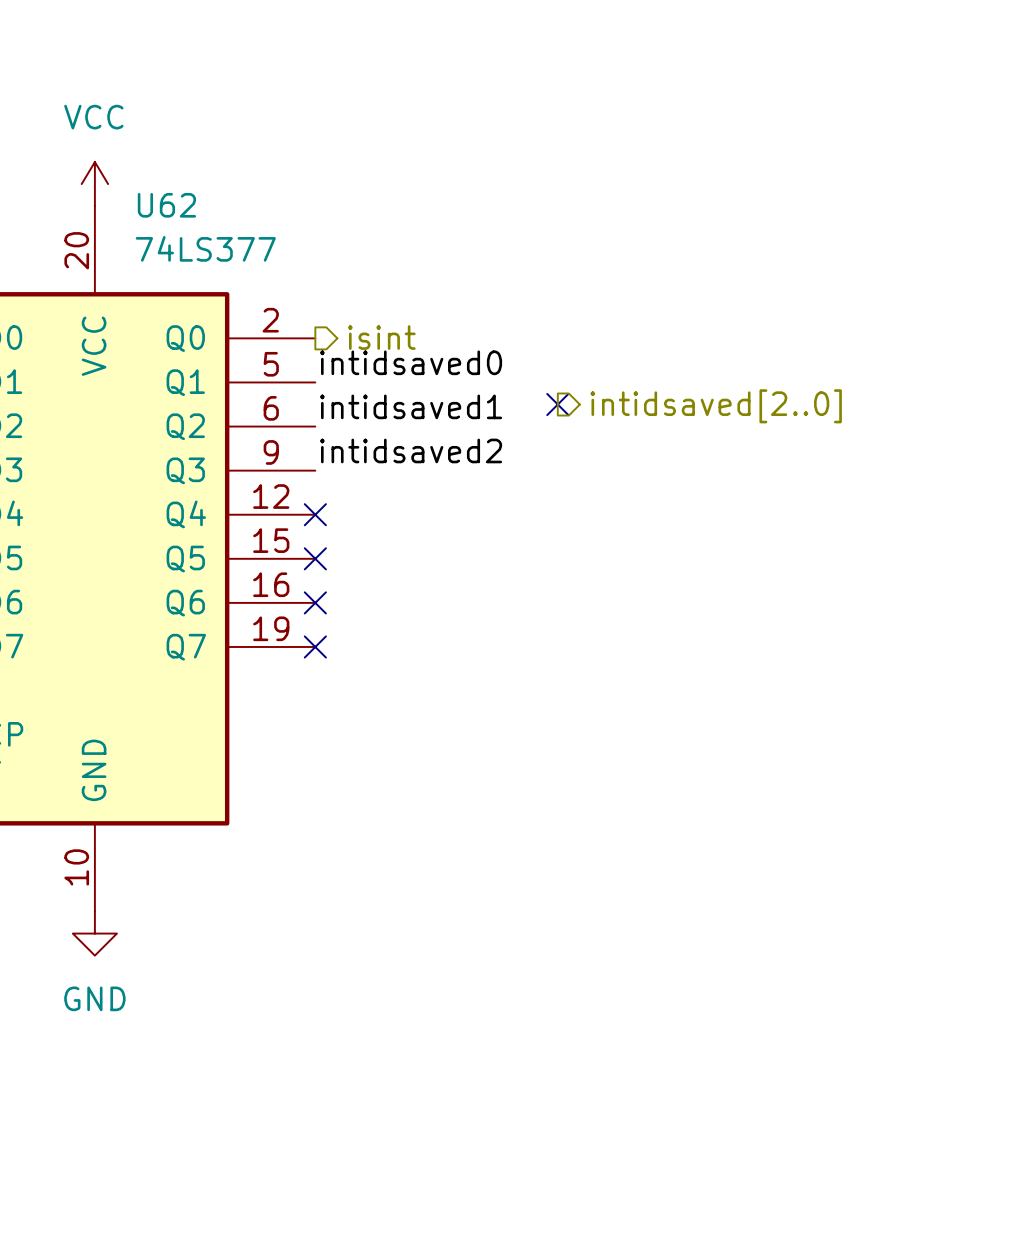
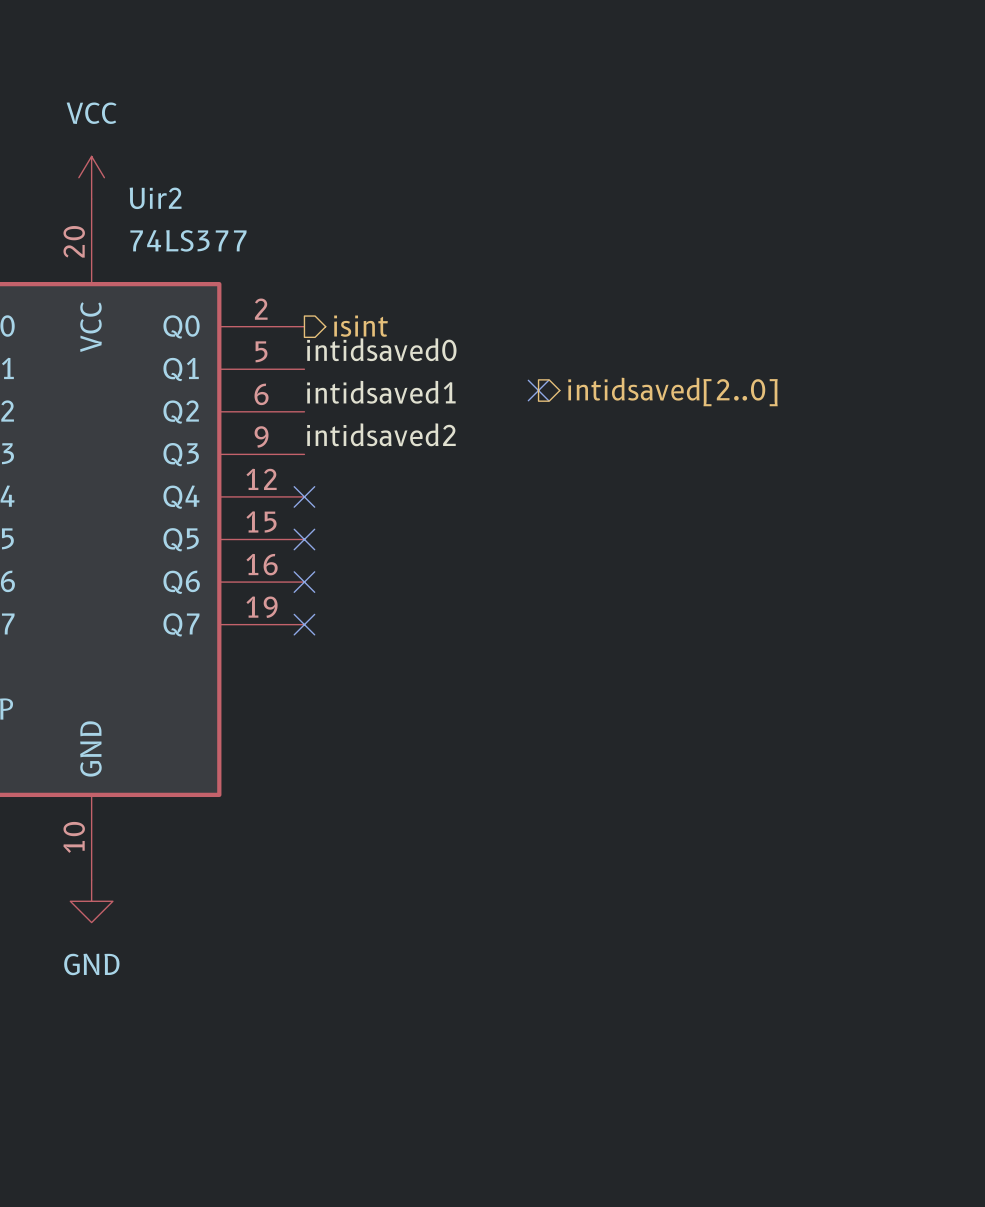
U62 name: U62 (166, 205) -> Uir2 (155, 198)

